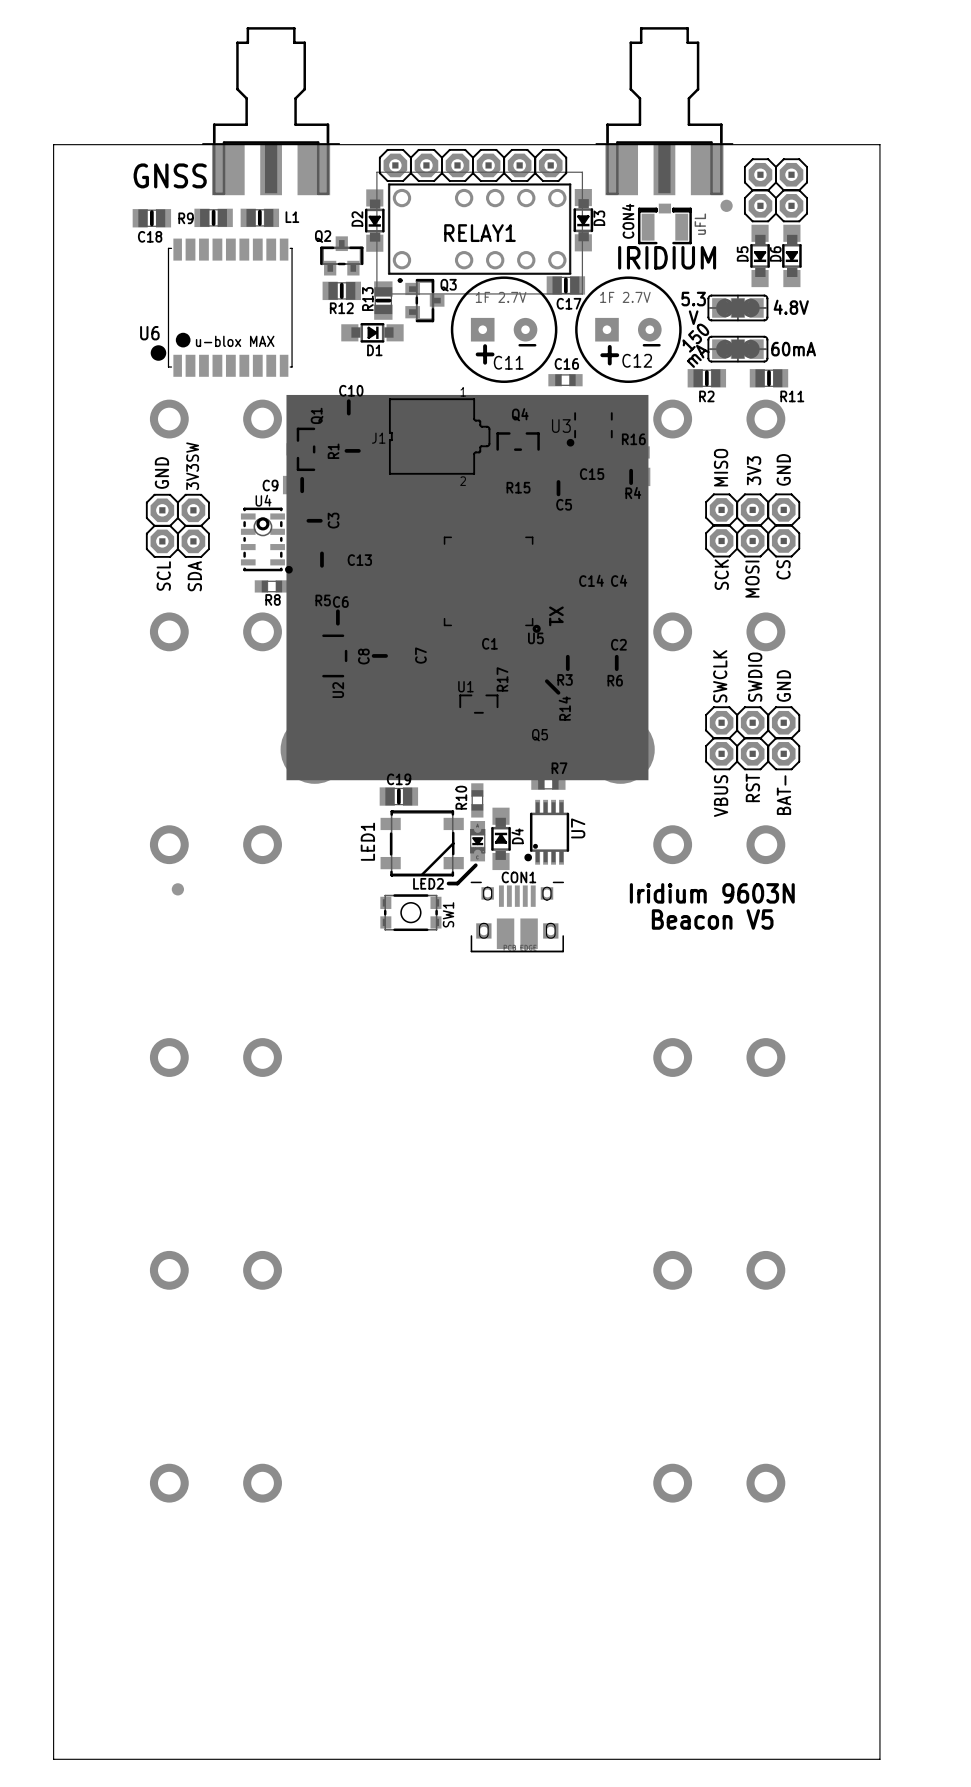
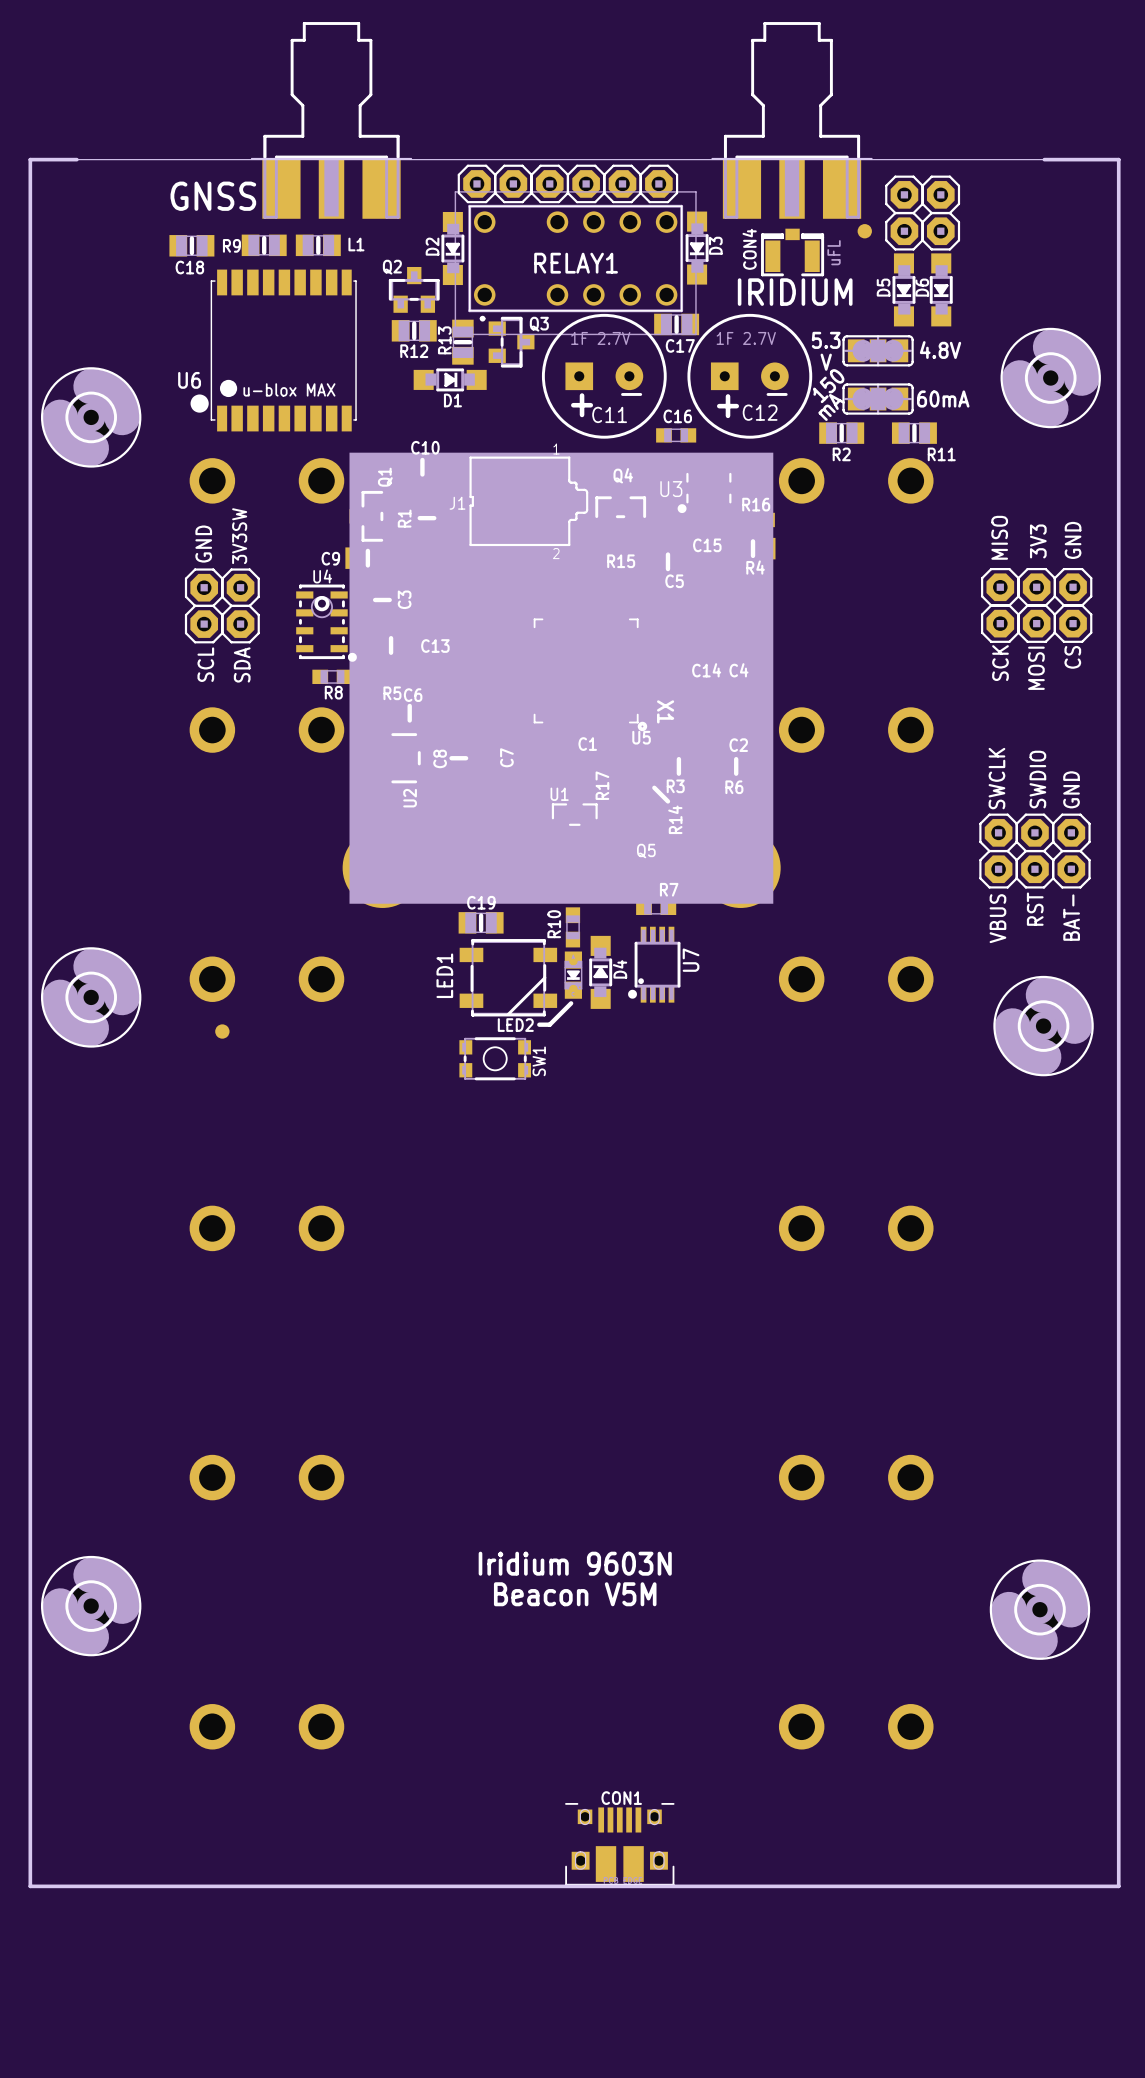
board edge: (53, 144) (53, 1759) (879, 1759) (879, 144) -> (76, 159) (30, 159) (30, 1886) (1118, 1886) (1118, 159) (1044, 159)
part: none -> (1050, 378)
part: none -> (91, 417)
text position: GND (783, 469) -> GND (1073, 540)
MISO position: (721, 509) -> (1000, 587)
3V3 position: (752, 509) -> (1036, 587)
part position: (783, 509) -> (1073, 587)
SCK position: (721, 540) -> (1000, 623)
MOSI position: (752, 540) -> (1036, 623)
CS position: (783, 540) -> (1073, 623)
SWCLK position: (721, 722) -> (998, 832)
SWDIO position: (752, 722) -> (1034, 832)
GND position: (783, 722) -> (1071, 832)
VBUS position: (721, 753) -> (998, 869)
RST position: (752, 753) -> (1034, 869)
BAT- position: (783, 753) -> (1071, 869)
part: none -> (91, 997)
part: none -> (1043, 1026)
text: Iridium 9603N (712, 893) -> none
CON1 position: (517, 916) -> (619, 1844)
text: Beacon V5 (712, 919) -> none
text: none -> Iridium 9603N (575, 1563)
text: none -> Beacon V5M (575, 1594)
part: none -> (91, 1606)
part: none -> (1039, 1609)

